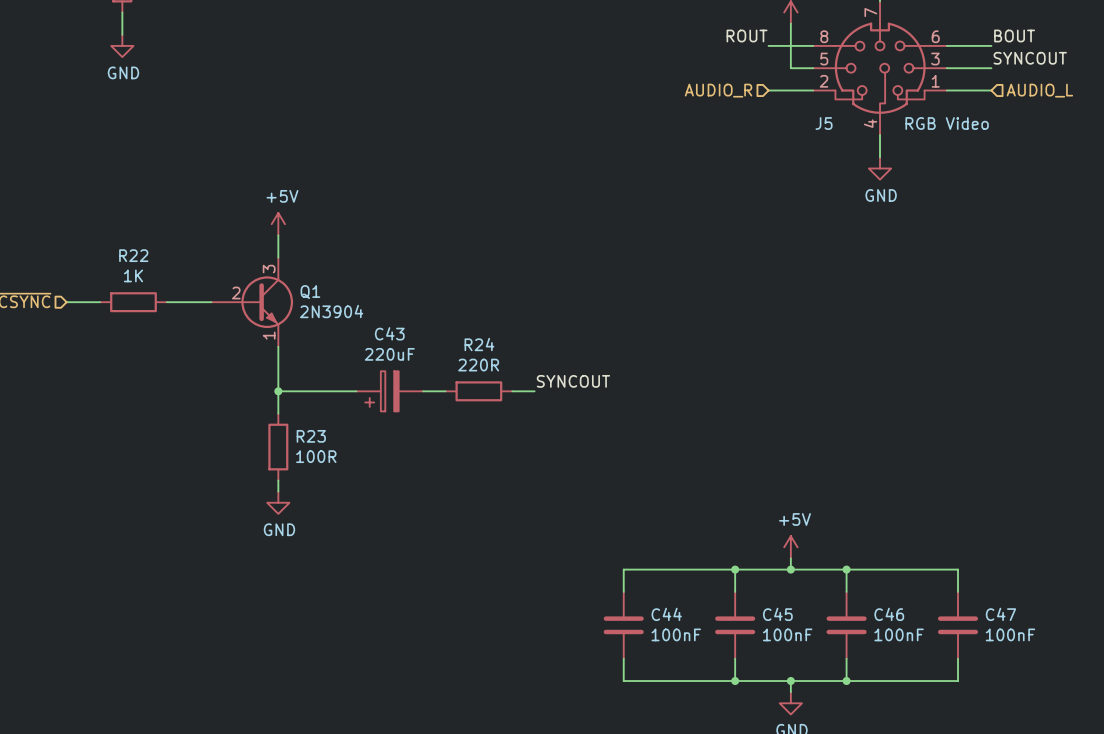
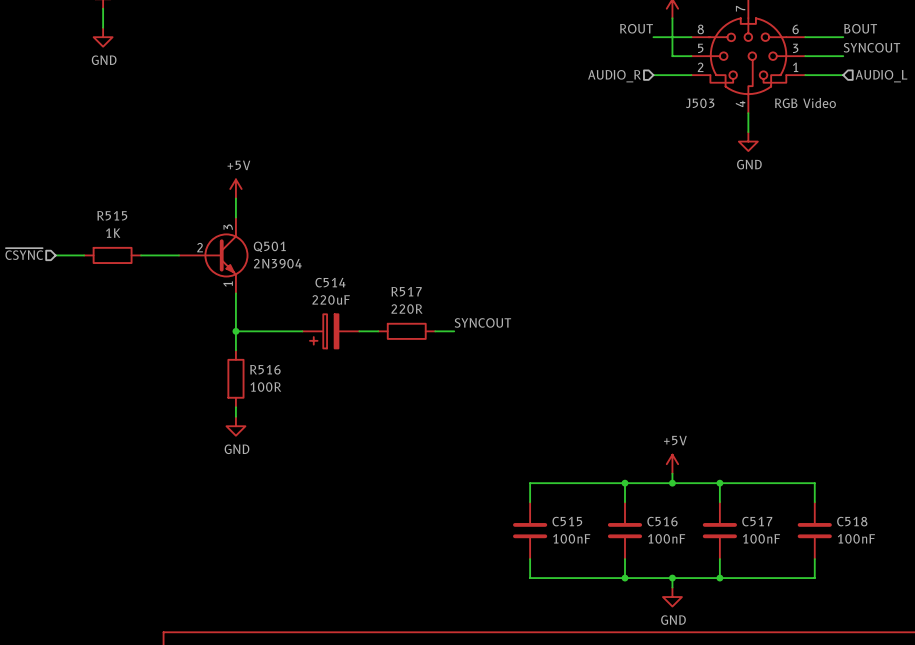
J5 name: J5 (824, 123) -> J503 (700, 103)
R22 name: R22 (133, 255) -> R515 (112, 215)
Q1 name: Q1 (310, 292) -> Q501 (269, 246)
C43 name: C43 (389, 333) -> C514 (330, 282)
R24 name: R24 (479, 344) -> R517 (406, 291)
R23 name: R23 (311, 436) -> R516 (265, 369)
C44 name: C44 (666, 614) -> C515 (567, 521)
C45 name: C45 (777, 614) -> C516 (662, 521)
C46 name: C46 (889, 614) -> C517 (757, 521)
C47 name: C47 (1000, 614) -> C518 (852, 521)

